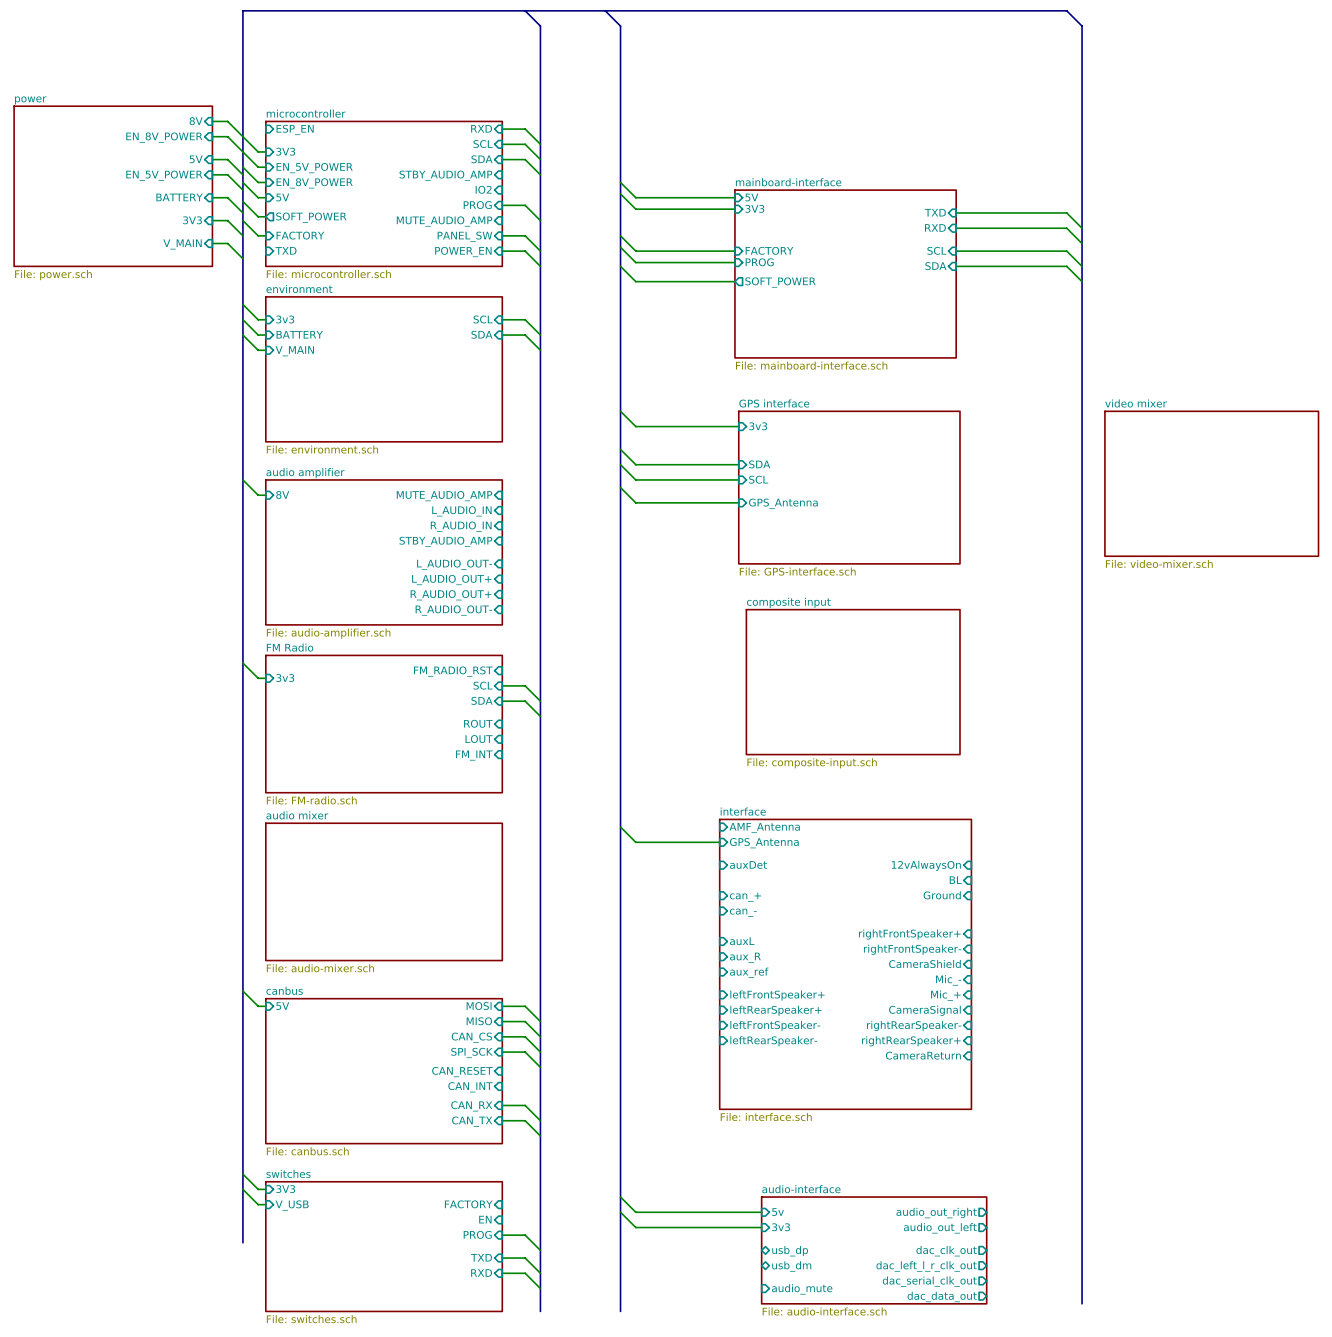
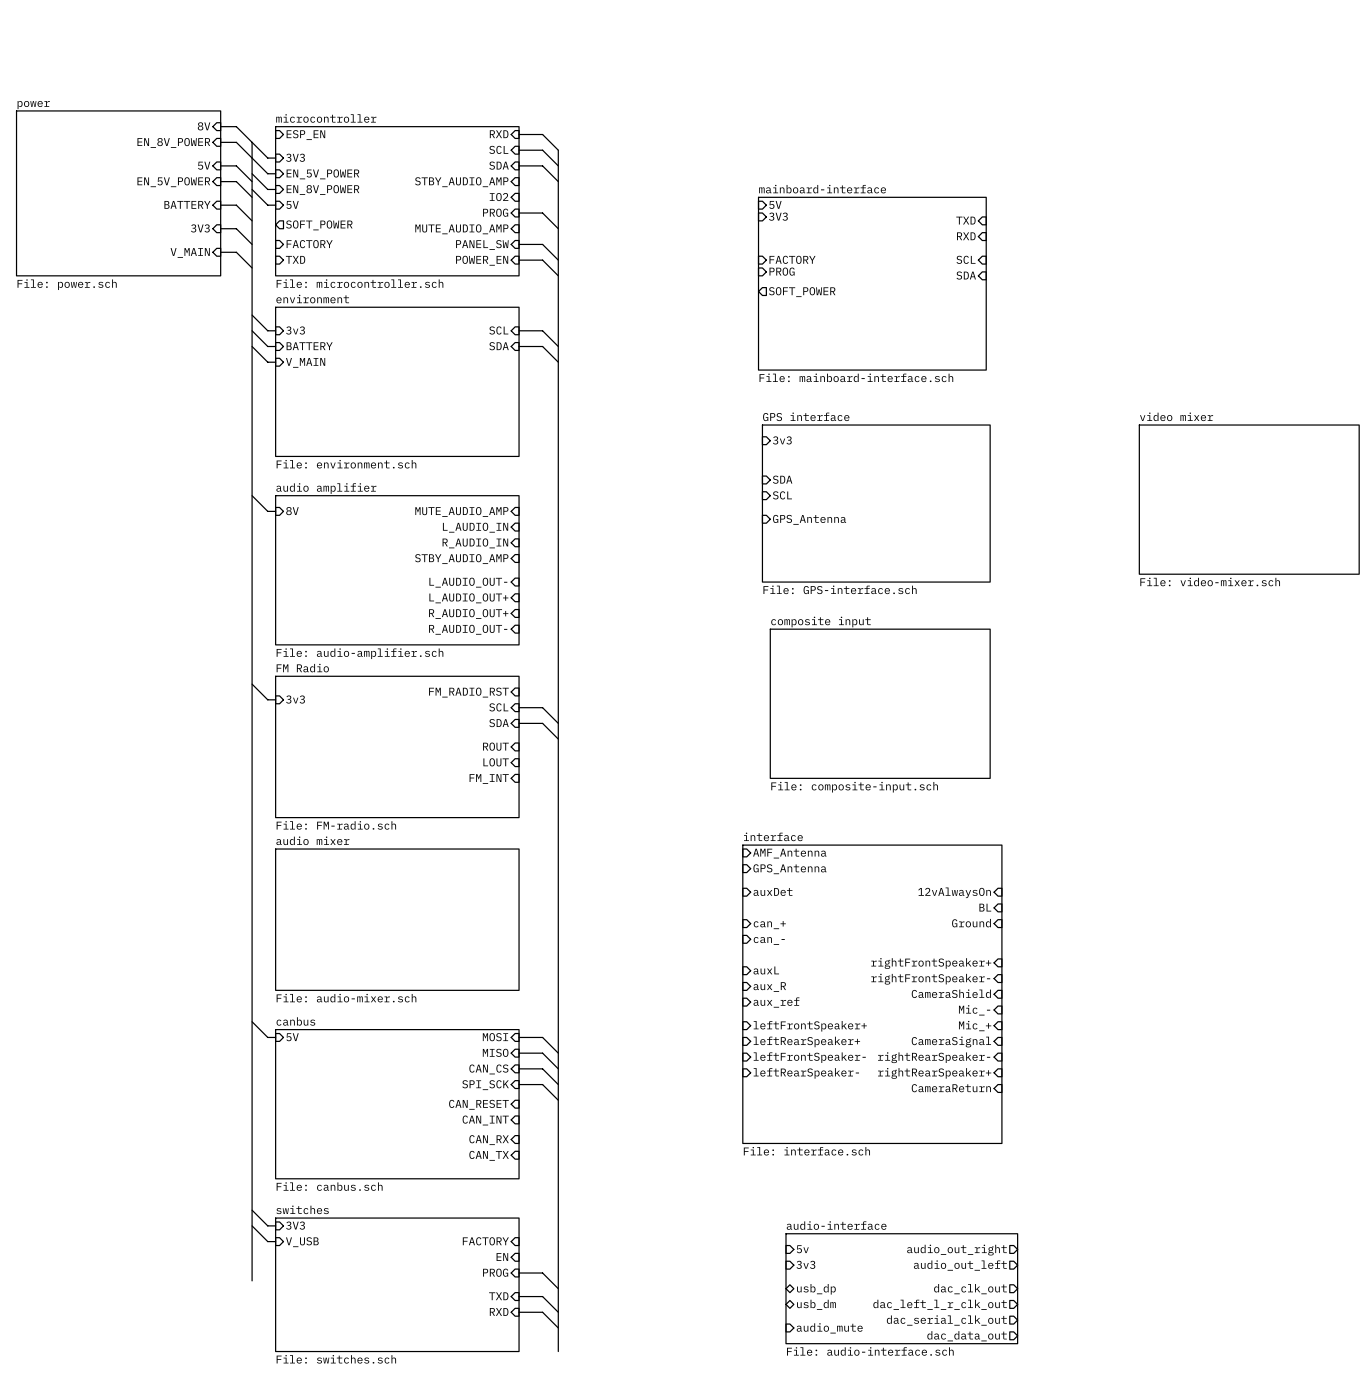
bus: (525, 10) (540, 26) (540, 144) -> none
bus: (605, 10) (620, 26) (620, 1311) -> none
bus: (242, 136) (242, 10) (1066, 10) (1082, 26) (1082, 1303) -> none
wire: (620, 182) (635, 197) (734, 197) -> none
wire: (620, 193) (635, 209) (734, 209) -> none
wire: (242, 201) (258, 216) (265, 216) -> none
wire: (956, 212) (1066, 212) (1082, 228) -> none
wire: (242, 220) (258, 235) (265, 235) -> none
wire: (956, 228) (1066, 228) (1082, 243) -> none
wire: (620, 235) (635, 251) (734, 251) -> none
wire: (620, 247) (635, 262) (734, 262) -> none
wire: (956, 251) (1066, 251) (1082, 266) -> none
wire: (620, 266) (635, 281) (734, 281) -> none
wire: (956, 266) (1066, 266) (1082, 281) -> none
wire: (620, 411) (635, 426) (738, 426) -> none
wire: (620, 449) (635, 464) (738, 464) -> none
wire: (620, 464) (635, 479) (738, 479) -> none
wire: (620, 487) (635, 502) (738, 502) -> none
wire: (620, 827) (635, 842) (719, 842) -> none
wire: (502, 1105) (525, 1105) (540, 1120) -> none
wire: (502, 1120) (525, 1120) (540, 1135) -> none
wire: (620, 1197) (635, 1212) (761, 1212) -> none
wire: (620, 1212) (635, 1227) (761, 1227) -> none

